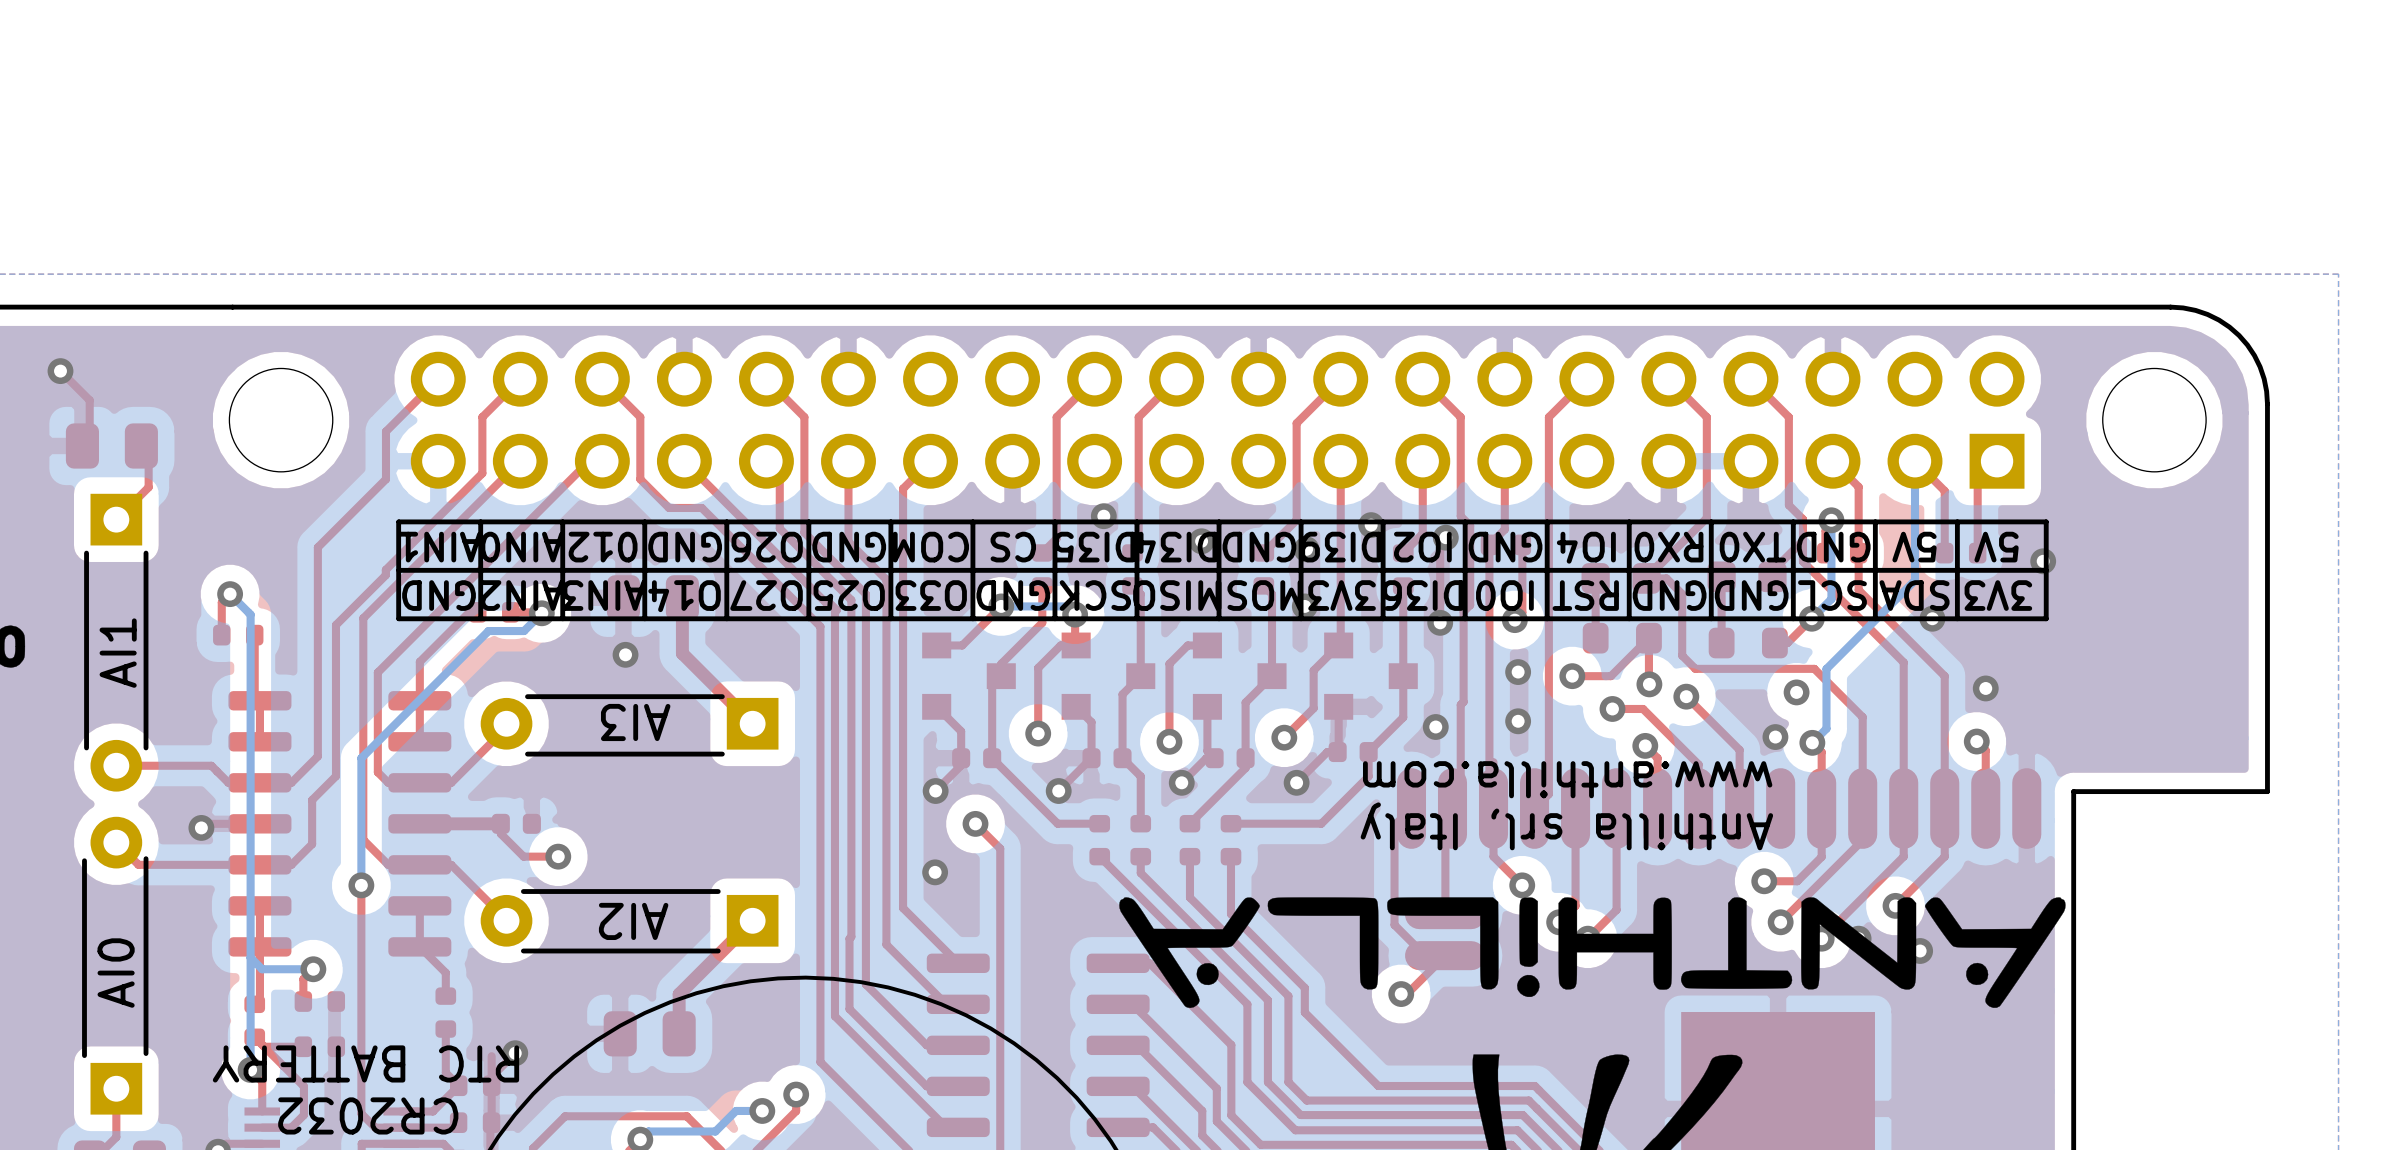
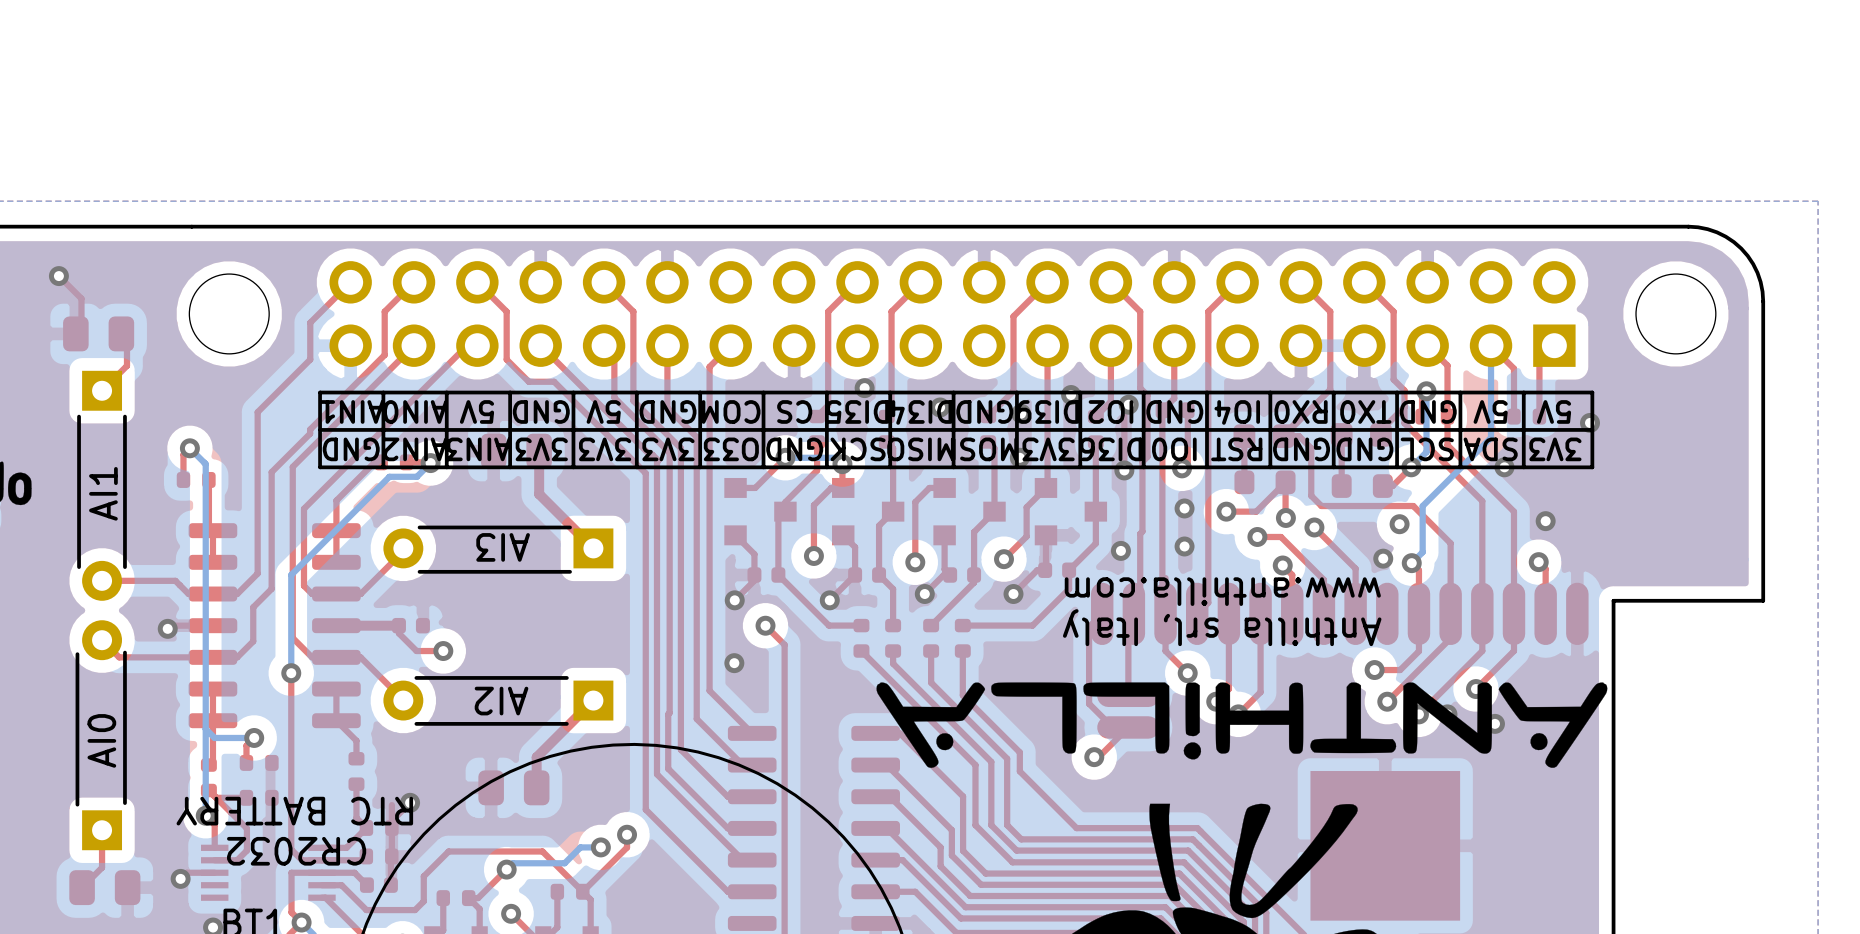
text: 012 (603, 547) -> 5V (476, 411)
text: O26 (767, 547) -> 5V (603, 411)
text: O27 (766, 595) -> 3V3 (605, 449)
text: O25 (849, 595) -> 3V3 (668, 449)
text: O14 (684, 596) -> 3V3 (541, 449)
via: (625, 654) -> none

